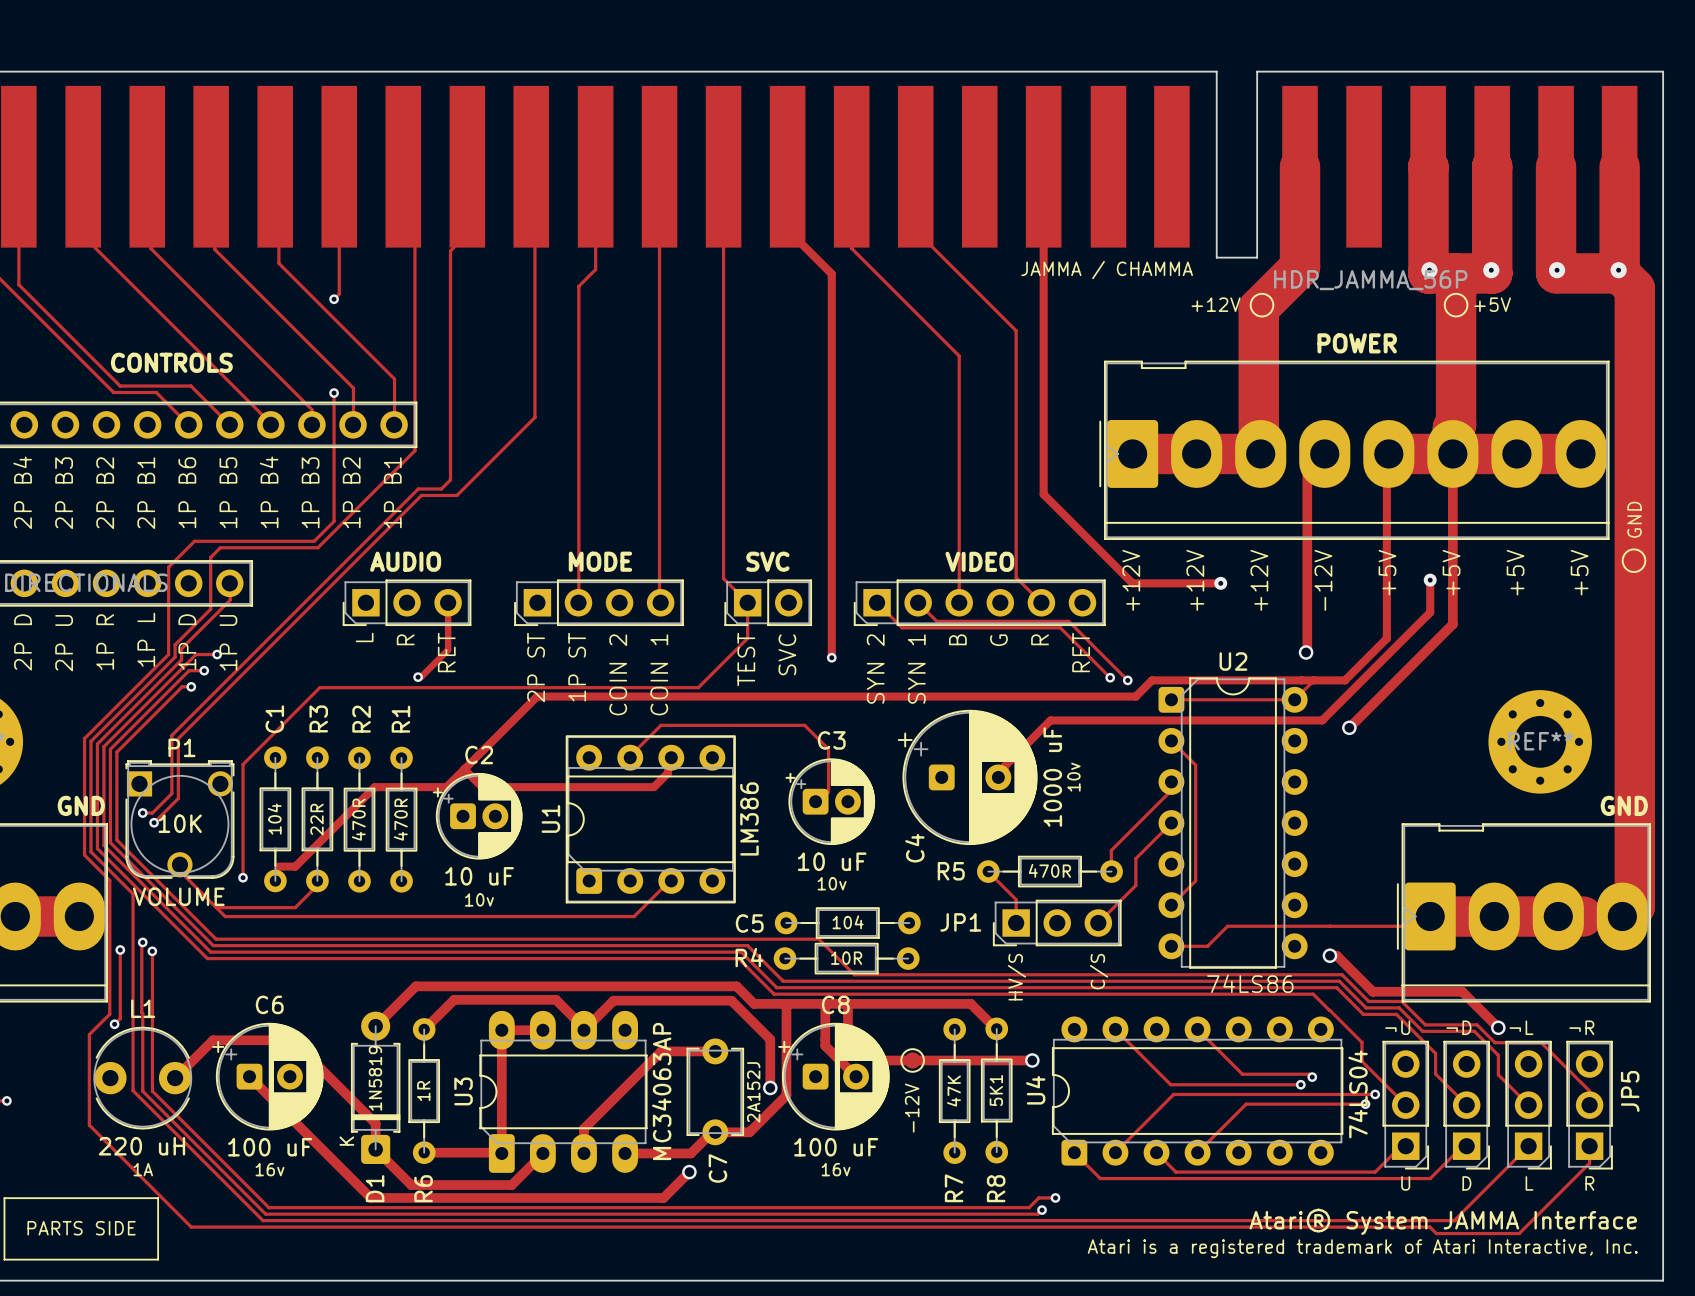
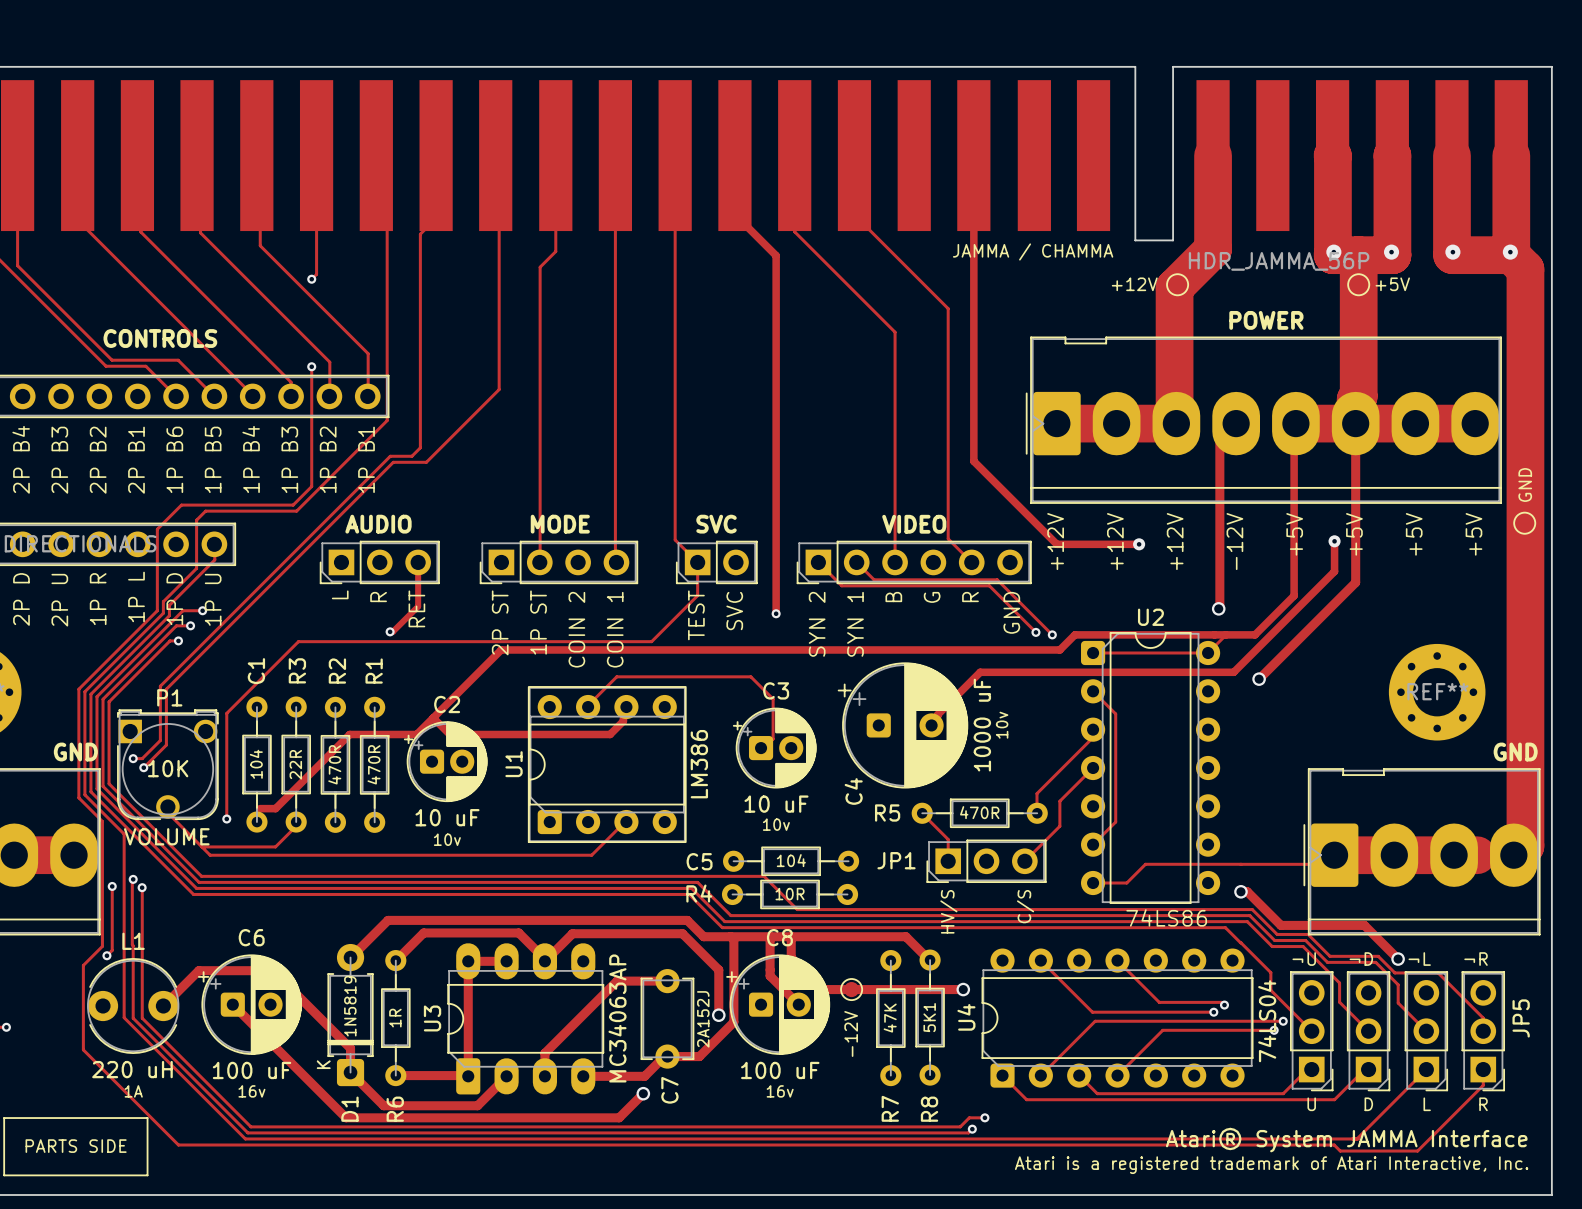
text: RET (1081, 652) -> GND (1011, 612)

